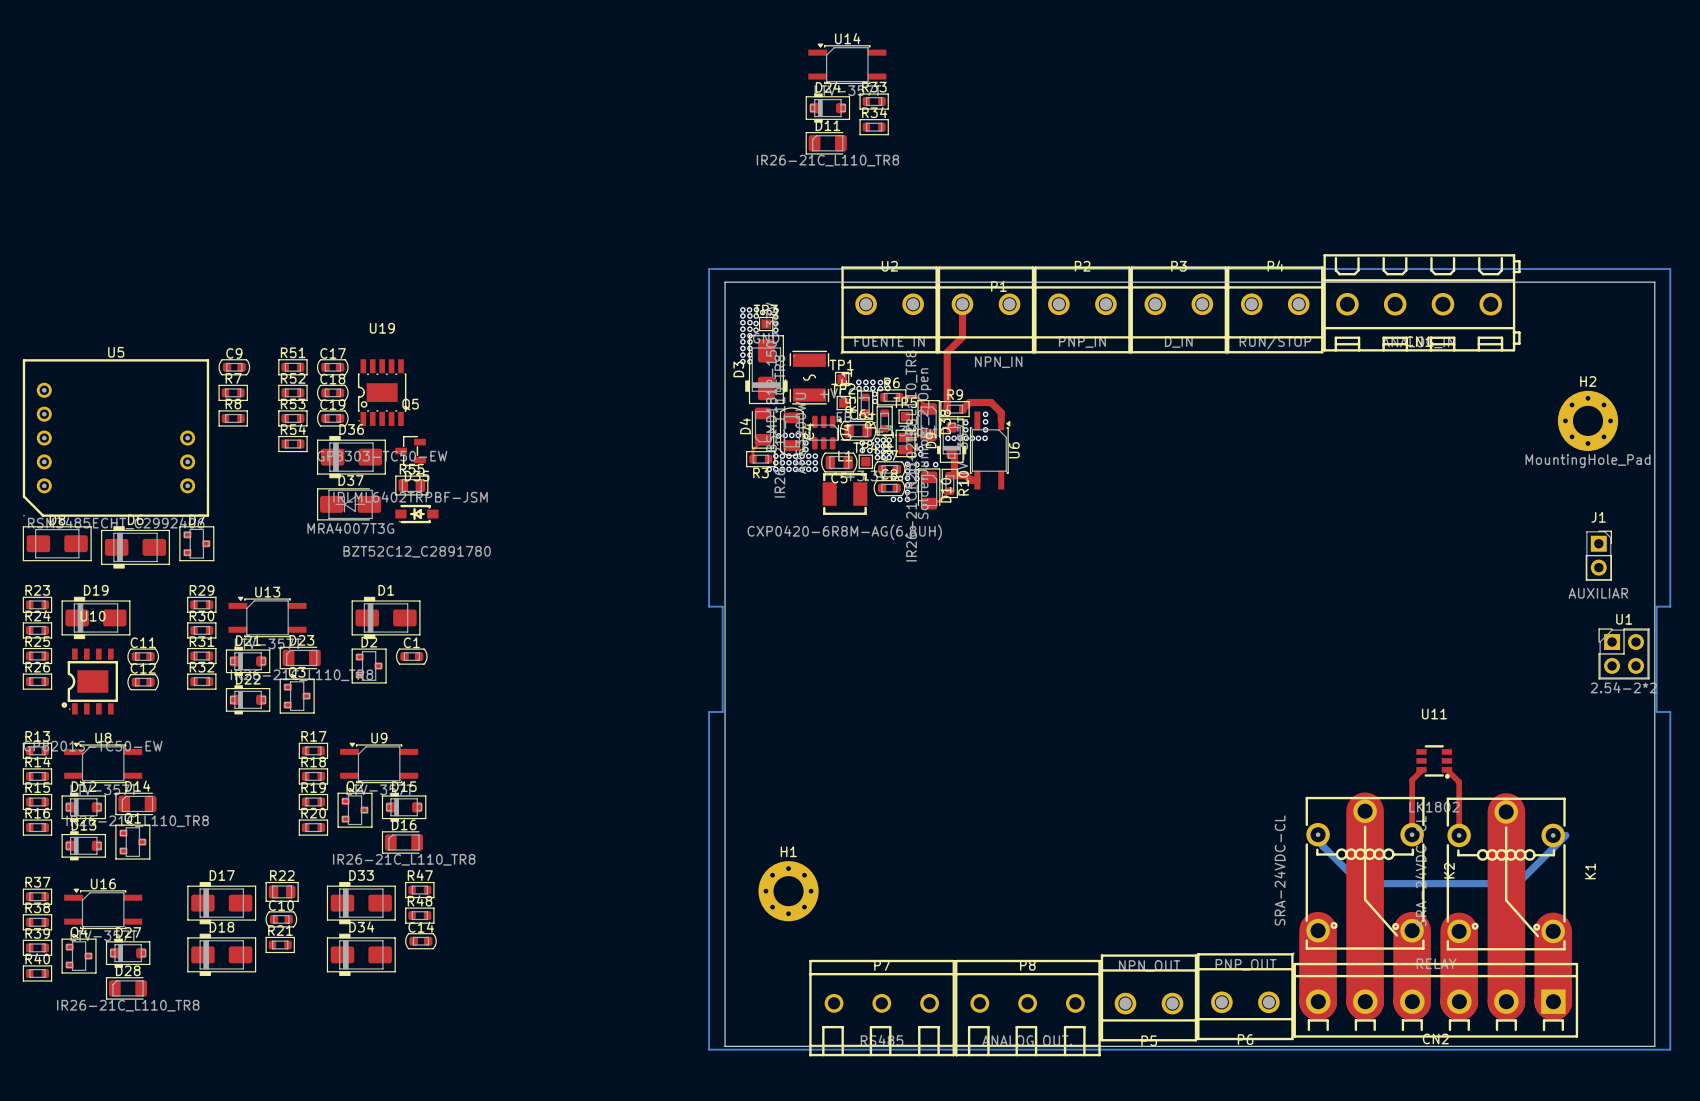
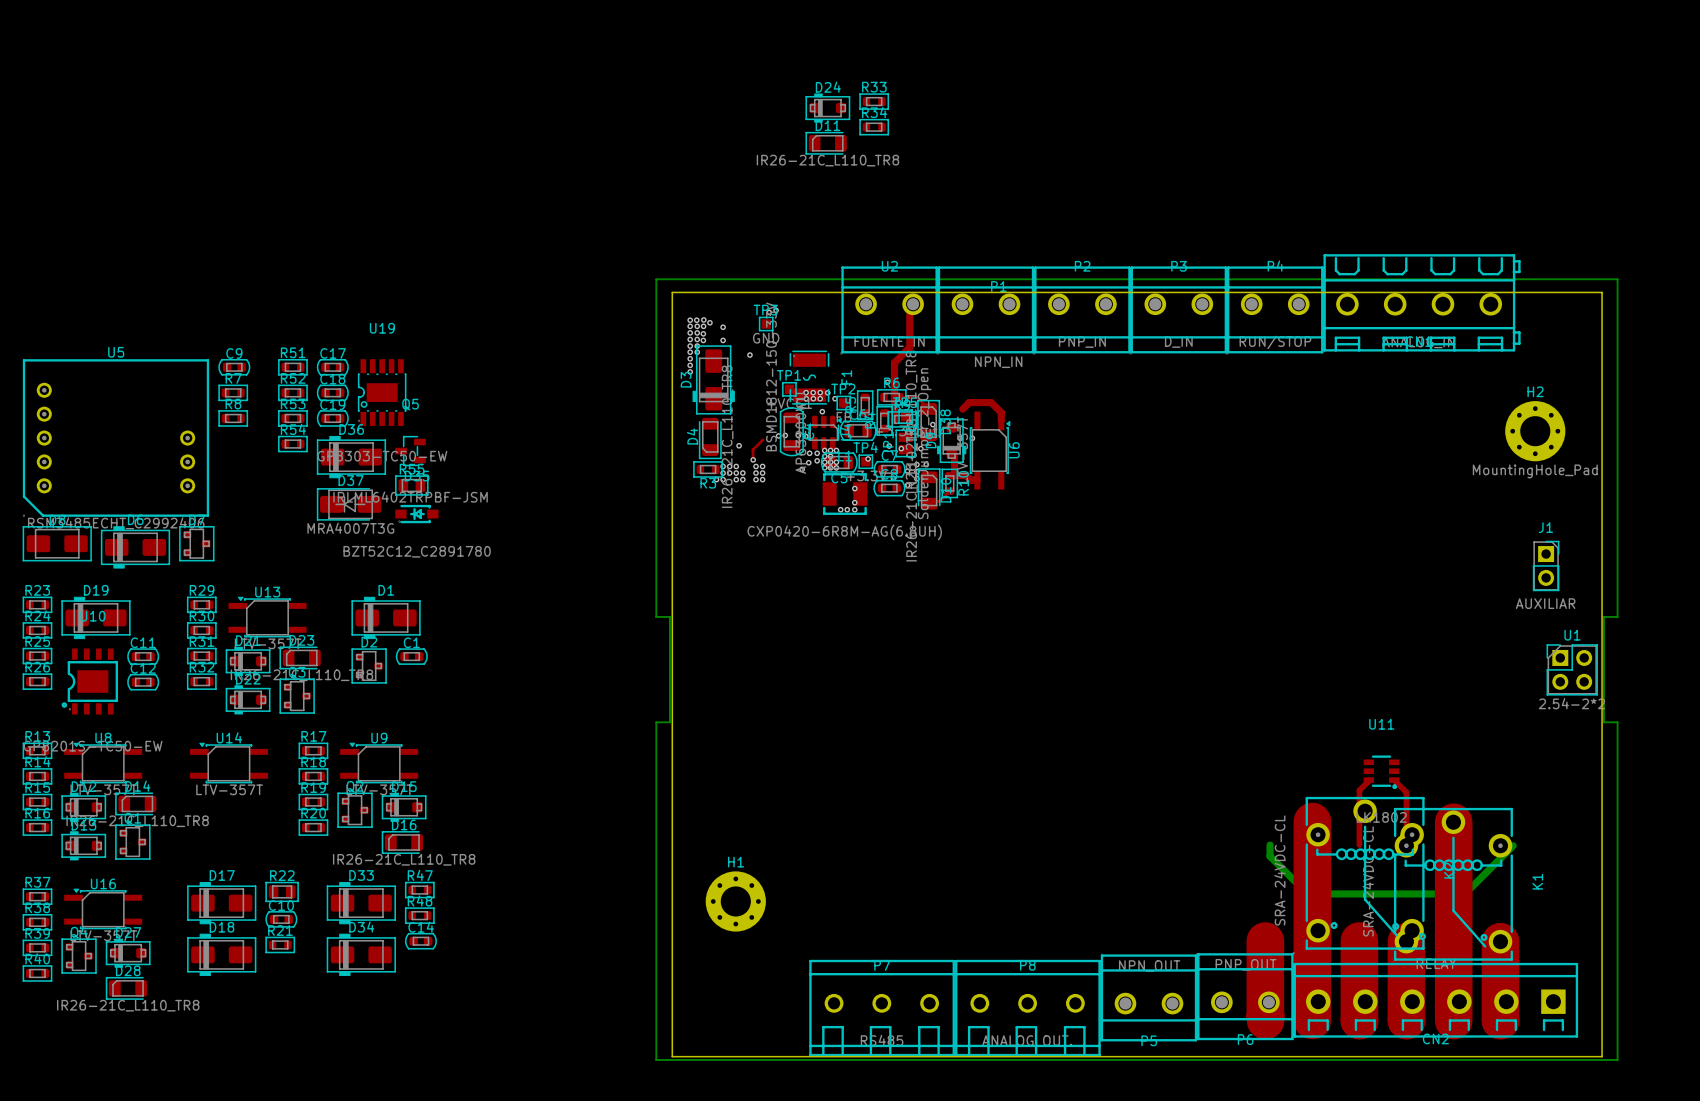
U14 position: (847, 63) -> (228, 762)
bottom track: (709, 268) (1670, 268) (1670, 606) (1656, 606) (1656, 711) (1670, 711) (1670, 1049) (709, 1049) (709, 711) (722, 711) (722, 606) (709, 606) (709, 268) -> (656, 279) (1617, 279) (1617, 616) (1603, 616) (1603, 722) (1617, 722) (1617, 1059) (656, 1059) (656, 722) (669, 722) (669, 616) (656, 616) (656, 279)
board edge: (725, 282) (1654, 282) (1654, 1046) (725, 1046) (725, 282) -> (672, 292) (1602, 292) (1602, 1056) (672, 1056) (672, 292)
top track: (962, 304) (962, 337) (947, 352) (947, 409) -> (909, 314) (909, 347) (894, 362) (894, 419)
via: (742, 309) -> none
via: (749, 309) -> none
via: (756, 309) -> none
via: (762, 312) -> none
via: (742, 316) -> none
via: (749, 316) -> none
via: (756, 316) -> none
via: (775, 316) -> none
via: none -> (703, 319)
via: none -> (690, 320)
via: none -> (696, 320)
via: none -> (709, 322)
via: (742, 322) -> none
via: (749, 322) -> none
via: (756, 323) -> none
via: (775, 323) -> none
via: none -> (690, 326)
via: none -> (697, 326)
via: none -> (703, 326)
via: none -> (723, 327)
via: (742, 329) -> none
via: (749, 329) -> none
via: (756, 330) -> none
via: (775, 330) -> none
via: none -> (690, 332)
via: none -> (697, 332)
via: none -> (703, 333)
via: (742, 335) -> none
via: (749, 335) -> none
via: none -> (690, 339)
via: none -> (697, 339)
via: none -> (703, 340)
via: none -> (723, 340)
via: (742, 341) -> none
via: (749, 341) -> none
via: none -> (690, 346)
via: none -> (697, 346)
via: (742, 348) -> none
via: (749, 348) -> none
via: none -> (690, 352)
via: none -> (697, 352)
via: (742, 355) -> none
via: none -> (690, 358)
via: (742, 361) -> none
via: (749, 361) -> none
via: none -> (690, 365)
D3 position: (766, 369) -> (713, 379)
via: none -> (690, 371)
TP1 position: (842, 379) -> (789, 389)
via: (858, 382) -> none
via: (865, 382) -> none
via: (872, 382) -> none
via: (880, 382) -> none
via: (859, 388) -> none
via: (866, 388) -> none
via: (872, 388) -> none
via: (880, 388) -> none
via: (887, 388) -> none
via: none -> (806, 392)
via: none -> (813, 392)
via: none -> (820, 392)
via: none -> (827, 392)
via: (874, 394) -> none
via: none -> (806, 398)
via: none -> (813, 398)
via: none -> (820, 398)
via: none -> (835, 398)
via: (875, 401) -> none
R9 position: (954, 409) -> (902, 419)
via: none -> (822, 411)
via: (985, 414) -> none
H2 position: (1588, 420) -> (1535, 431)
via: (985, 421) -> none
via: (965, 422) -> none
via: none -> (932, 424)
D4 position: (763, 428) -> (710, 438)
via: (965, 429) -> none
via: (985, 429) -> none
via: (791, 435) -> none
via: (947, 438) -> none
via: (954, 438) -> none
via: (966, 438) -> none
via: (978, 438) -> none
via: (985, 438) -> none
via: (877, 440) -> none
via: (883, 440) -> none
via: (889, 440) -> none
via: (805, 442) -> none
via: (862, 442) -> none
via: (869, 442) -> none
via: none -> (739, 445)
via: (877, 446) -> none
via: (883, 446) -> none
via: none -> (901, 448)
via: (805, 449) -> none
via: none -> (824, 450)
via: none -> (830, 450)
via: none -> (836, 450)
via: (862, 450) -> none
via: (869, 450) -> none
via: (877, 451) -> none
via: (883, 451) -> none
via: (889, 451) -> none
via: none -> (809, 453)
via: none -> (817, 453)
via: (920, 454) -> none
via: (775, 456) -> none
via: (782, 456) -> none
via: (788, 456) -> none
via: (795, 456) -> none
via: (802, 456) -> none
via: (808, 456) -> none
via: (815, 456) -> none
via: none -> (824, 456)
via: none -> (830, 456)
via: (877, 457) -> none
via: (883, 457) -> none
via: (889, 457) -> none
via: none -> (868, 458)
via: none -> (753, 459)
R3 position: (760, 459) -> (708, 469)
via: none -> (817, 460)
via: (775, 462) -> none
via: (782, 462) -> none
via: (788, 462) -> none
via: (795, 462) -> none
via: (802, 462) -> none
via: (815, 462) -> none
via: none -> (824, 462)
via: none -> (830, 462)
via: none -> (836, 462)
via: (907, 464) -> none
via: (935, 464) -> none
via: none -> (723, 466)
via: none -> (729, 466)
via: none -> (736, 466)
via: none -> (756, 466)
via: none -> (762, 466)
via: none -> (824, 467)
via: none -> (830, 467)
via: none -> (836, 467)
via: (769, 469) -> none
via: (775, 469) -> none
via: (782, 469) -> none
via: (788, 469) -> none
via: (795, 469) -> none
via: (808, 469) -> none
via: (815, 469) -> none
via: none -> (723, 473)
via: none -> (729, 473)
via: none -> (736, 473)
via: none -> (742, 473)
via: none -> (756, 473)
via: none -> (762, 473)
via: (900, 478) -> none
via: (907, 478) -> none
via: none -> (716, 479)
via: none -> (723, 479)
via: none -> (736, 479)
via: none -> (742, 479)
via: none -> (756, 479)
via: none -> (762, 479)
via: none -> (854, 488)
via: (907, 492) -> none
via: (893, 499) -> none
via: (899, 499) -> none
via: (907, 499) -> none
via: none -> (854, 502)
via: none -> (840, 509)
via: none -> (847, 509)
via: none -> (854, 509)
J1 position: (1598, 555) -> (1546, 565)
U1 position: (1624, 653) -> (1572, 669)
U11 position: (1434, 761) -> (1381, 772)
top track: (1421, 769) (1412, 780) (1412, 834) -> (1368, 780) (1359, 790) (1359, 845)
top track: (1446, 769) (1459, 782) (1459, 835) -> (1394, 780) (1406, 792) (1406, 845)
top track: (1365, 811) (1365, 1001) -> none
top track: (1506, 811) (1506, 1001) -> none
top track: none -> (1312, 821) (1312, 1020)
top track: none -> (1453, 822) (1453, 1020)
bottom track: (1322, 834) (1322, 846) (1360, 883) (1517, 883) (1565, 835) -> (1270, 845) (1270, 856) (1307, 893) (1464, 893) (1513, 845)
K1 position: (1506, 874) -> (1453, 884)
H1 position: (788, 891) -> (735, 901)
top track: (1318, 930) (1318, 1001) -> none
top track: (1412, 930) (1412, 1001) -> none
top track: (1459, 931) (1459, 1001) -> none
top track: (1553, 931) (1553, 1001) -> none
top track: none -> (1265, 940) (1265, 1020)
top track: none -> (1359, 940) (1359, 1020)
top track: none -> (1406, 941) (1406, 1020)
top track: none -> (1500, 941) (1500, 1020)

